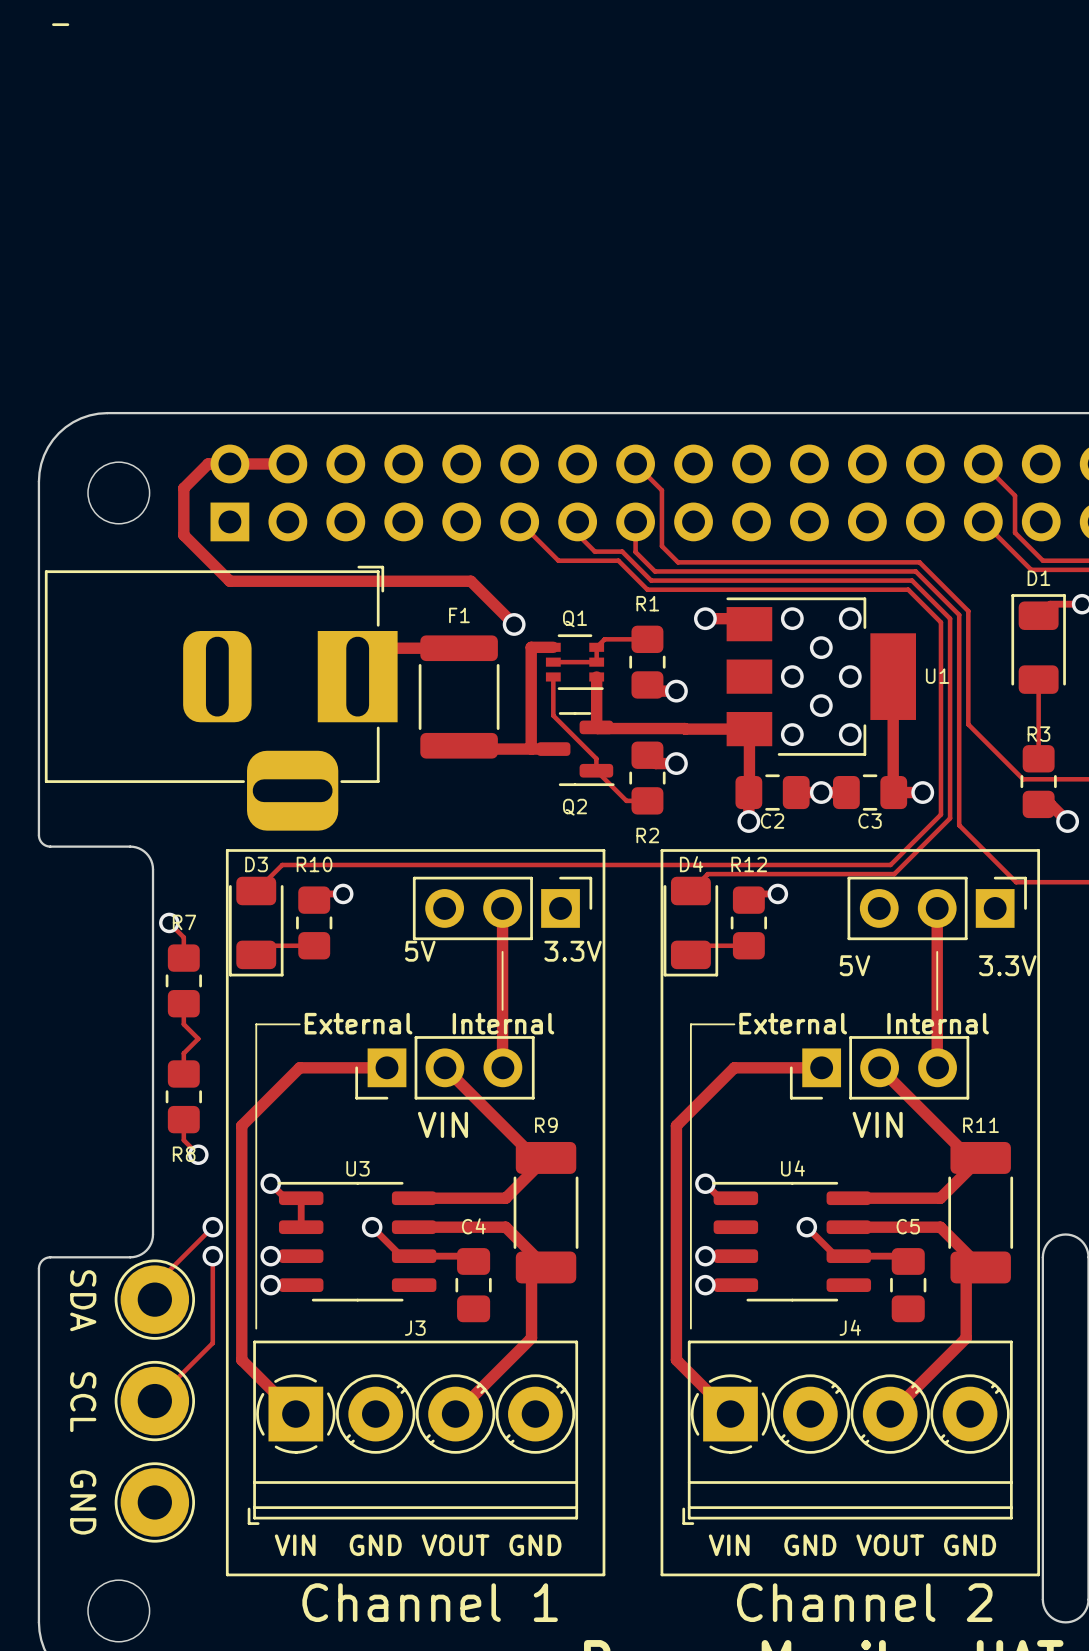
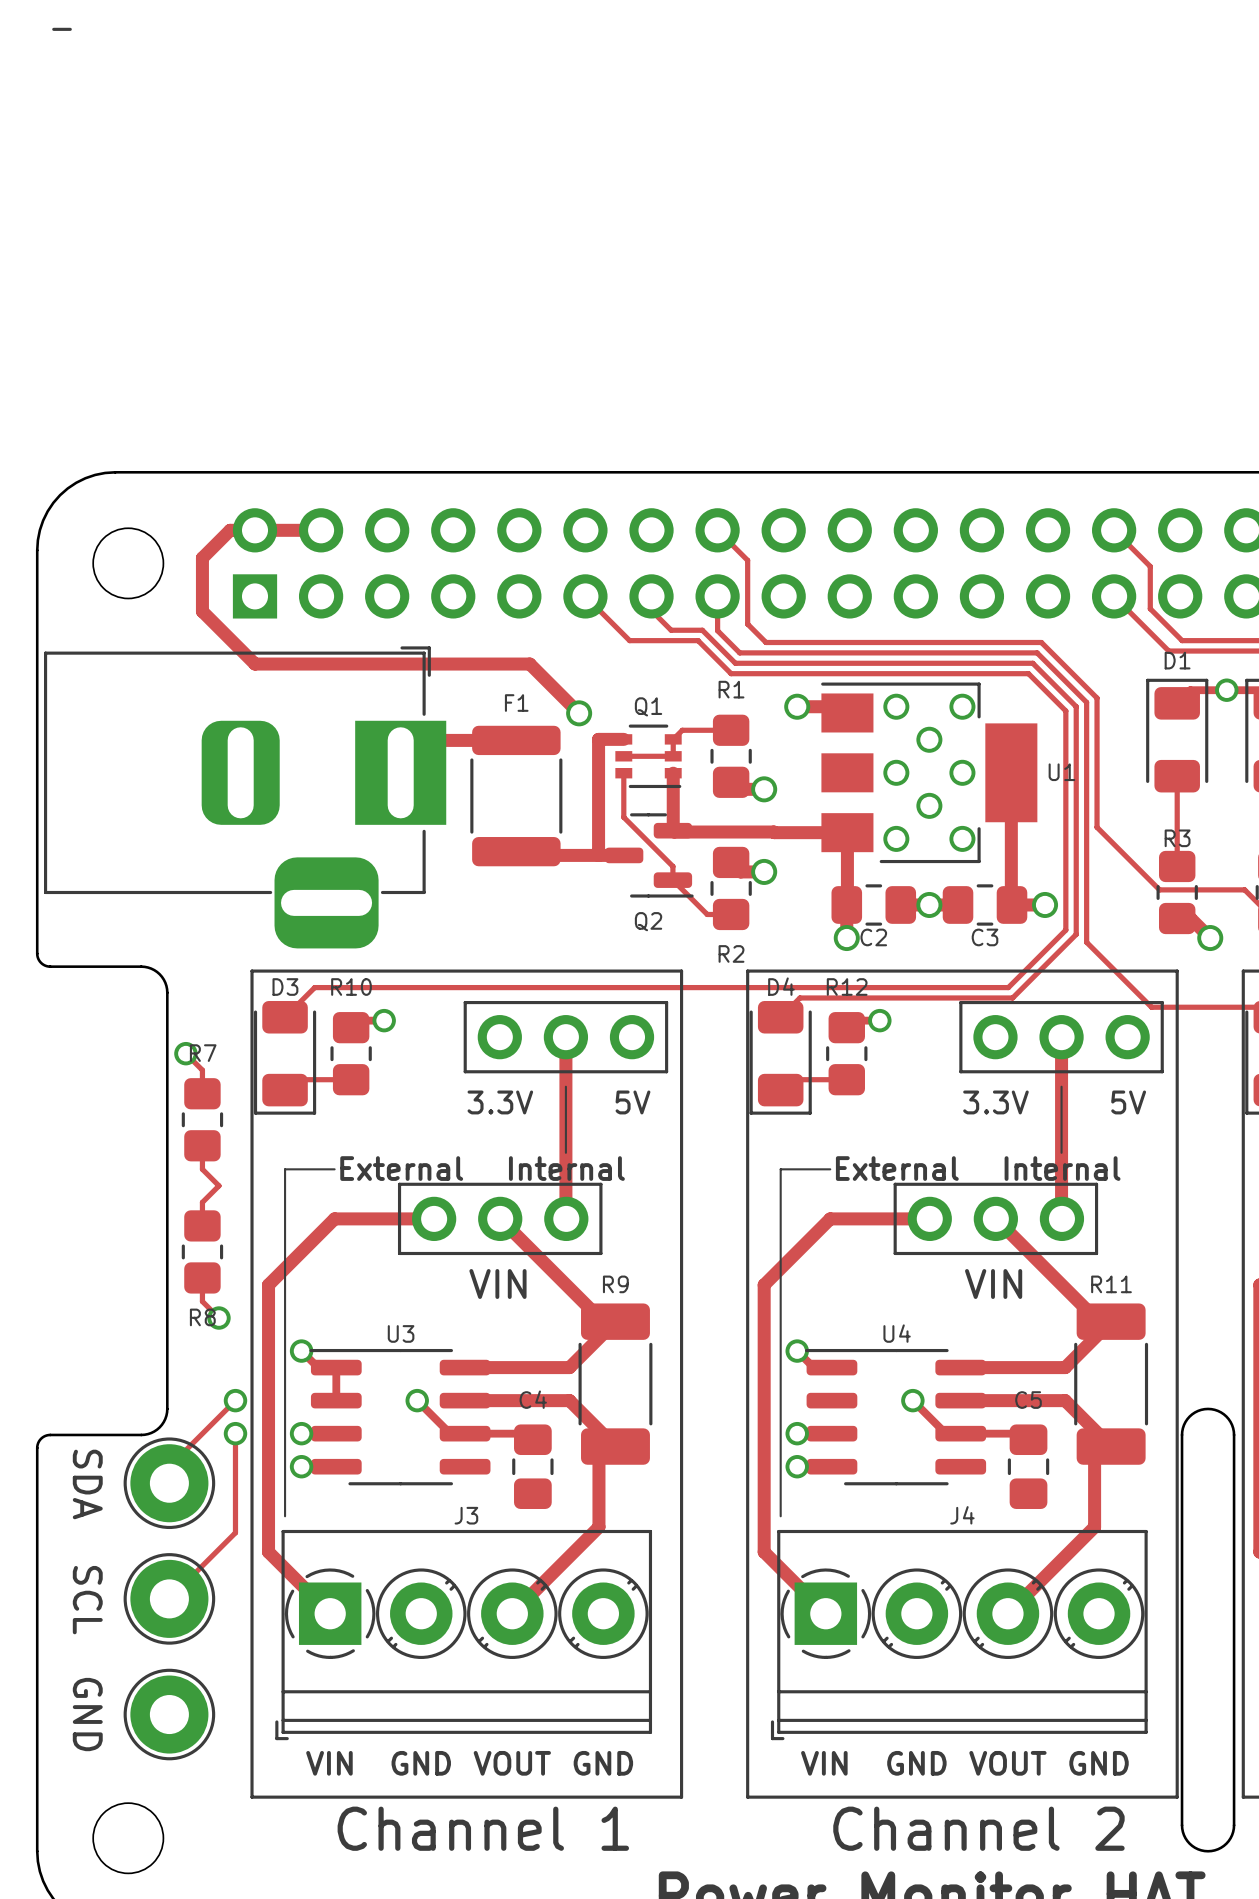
part footprint: [412, 876, 593, 941] -> [463, 1000, 669, 1074]
part footprint: [847, 876, 1027, 941] -> [959, 1000, 1164, 1074]
part footprint: [355, 1036, 535, 1100] -> [397, 1182, 603, 1256]
part footprint: [789, 1036, 970, 1100] -> [893, 1182, 1099, 1256]

